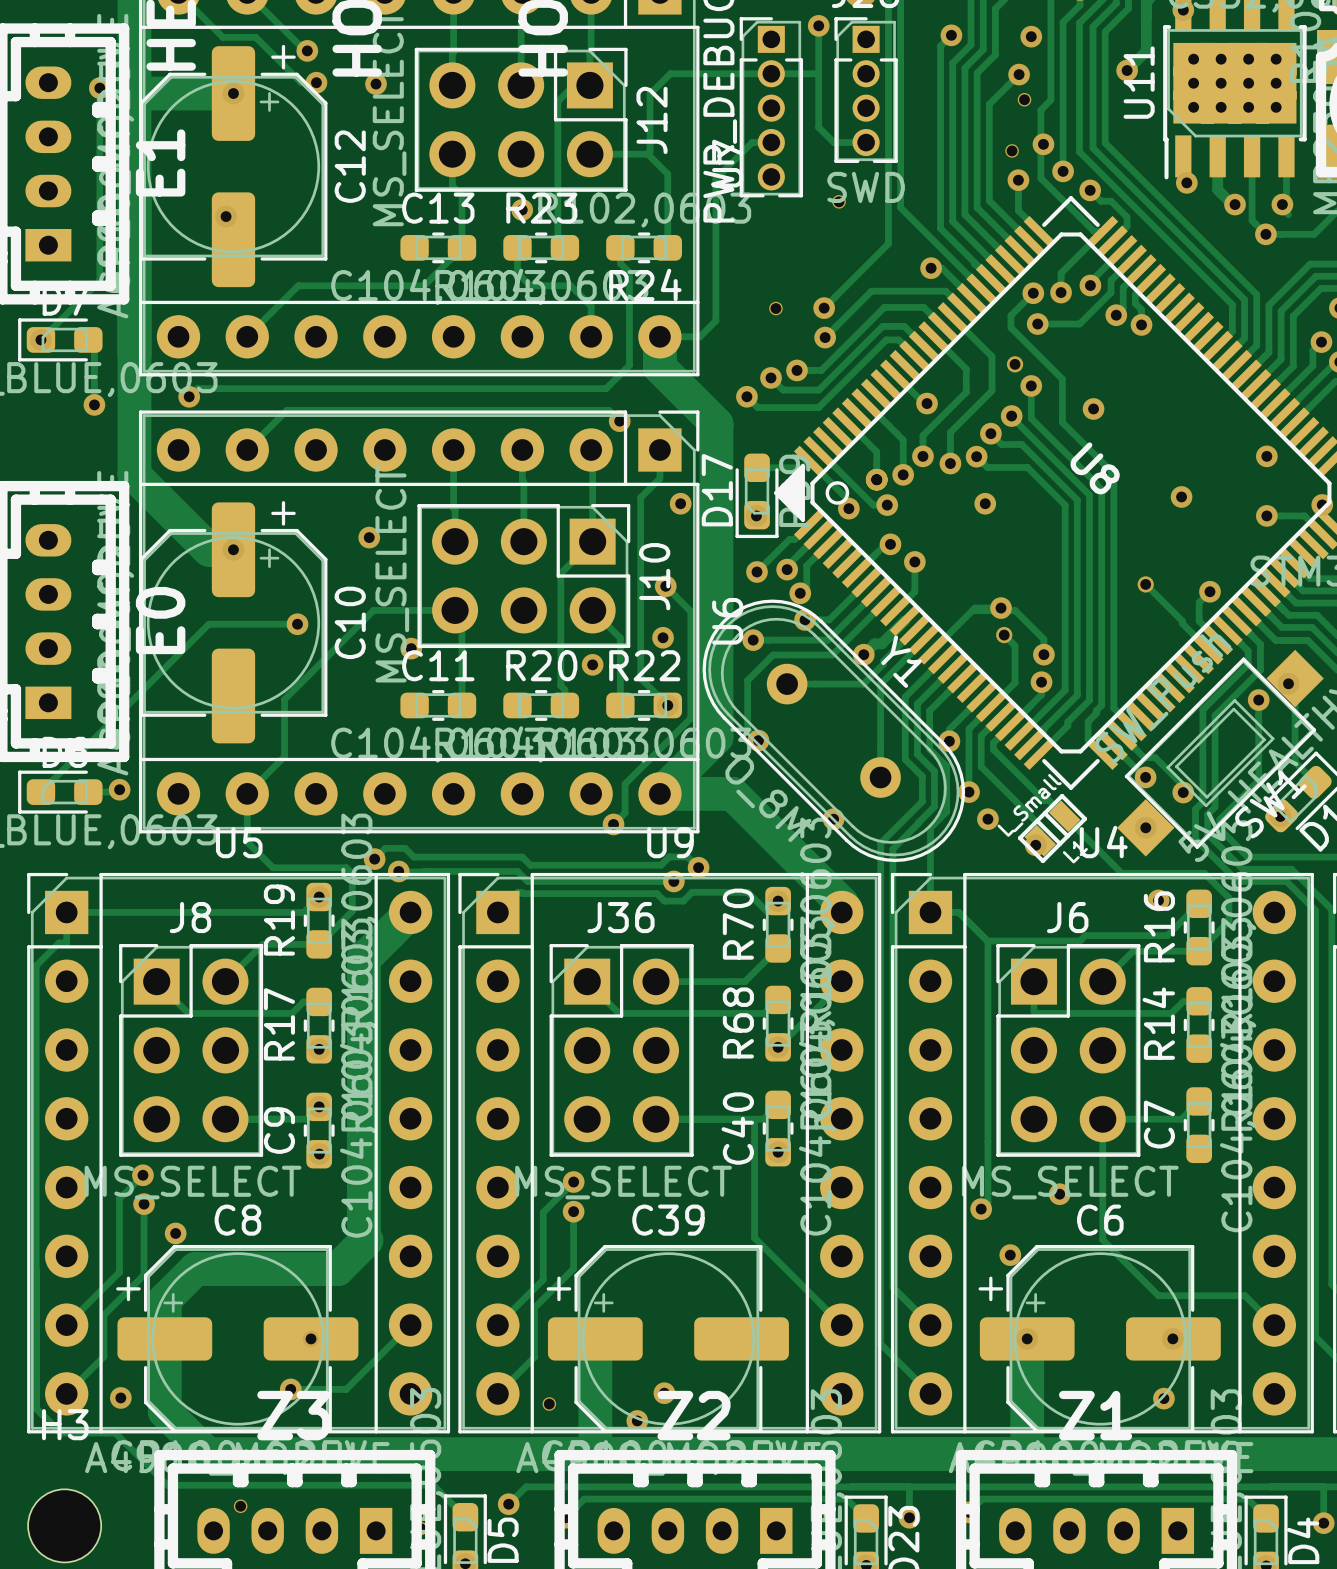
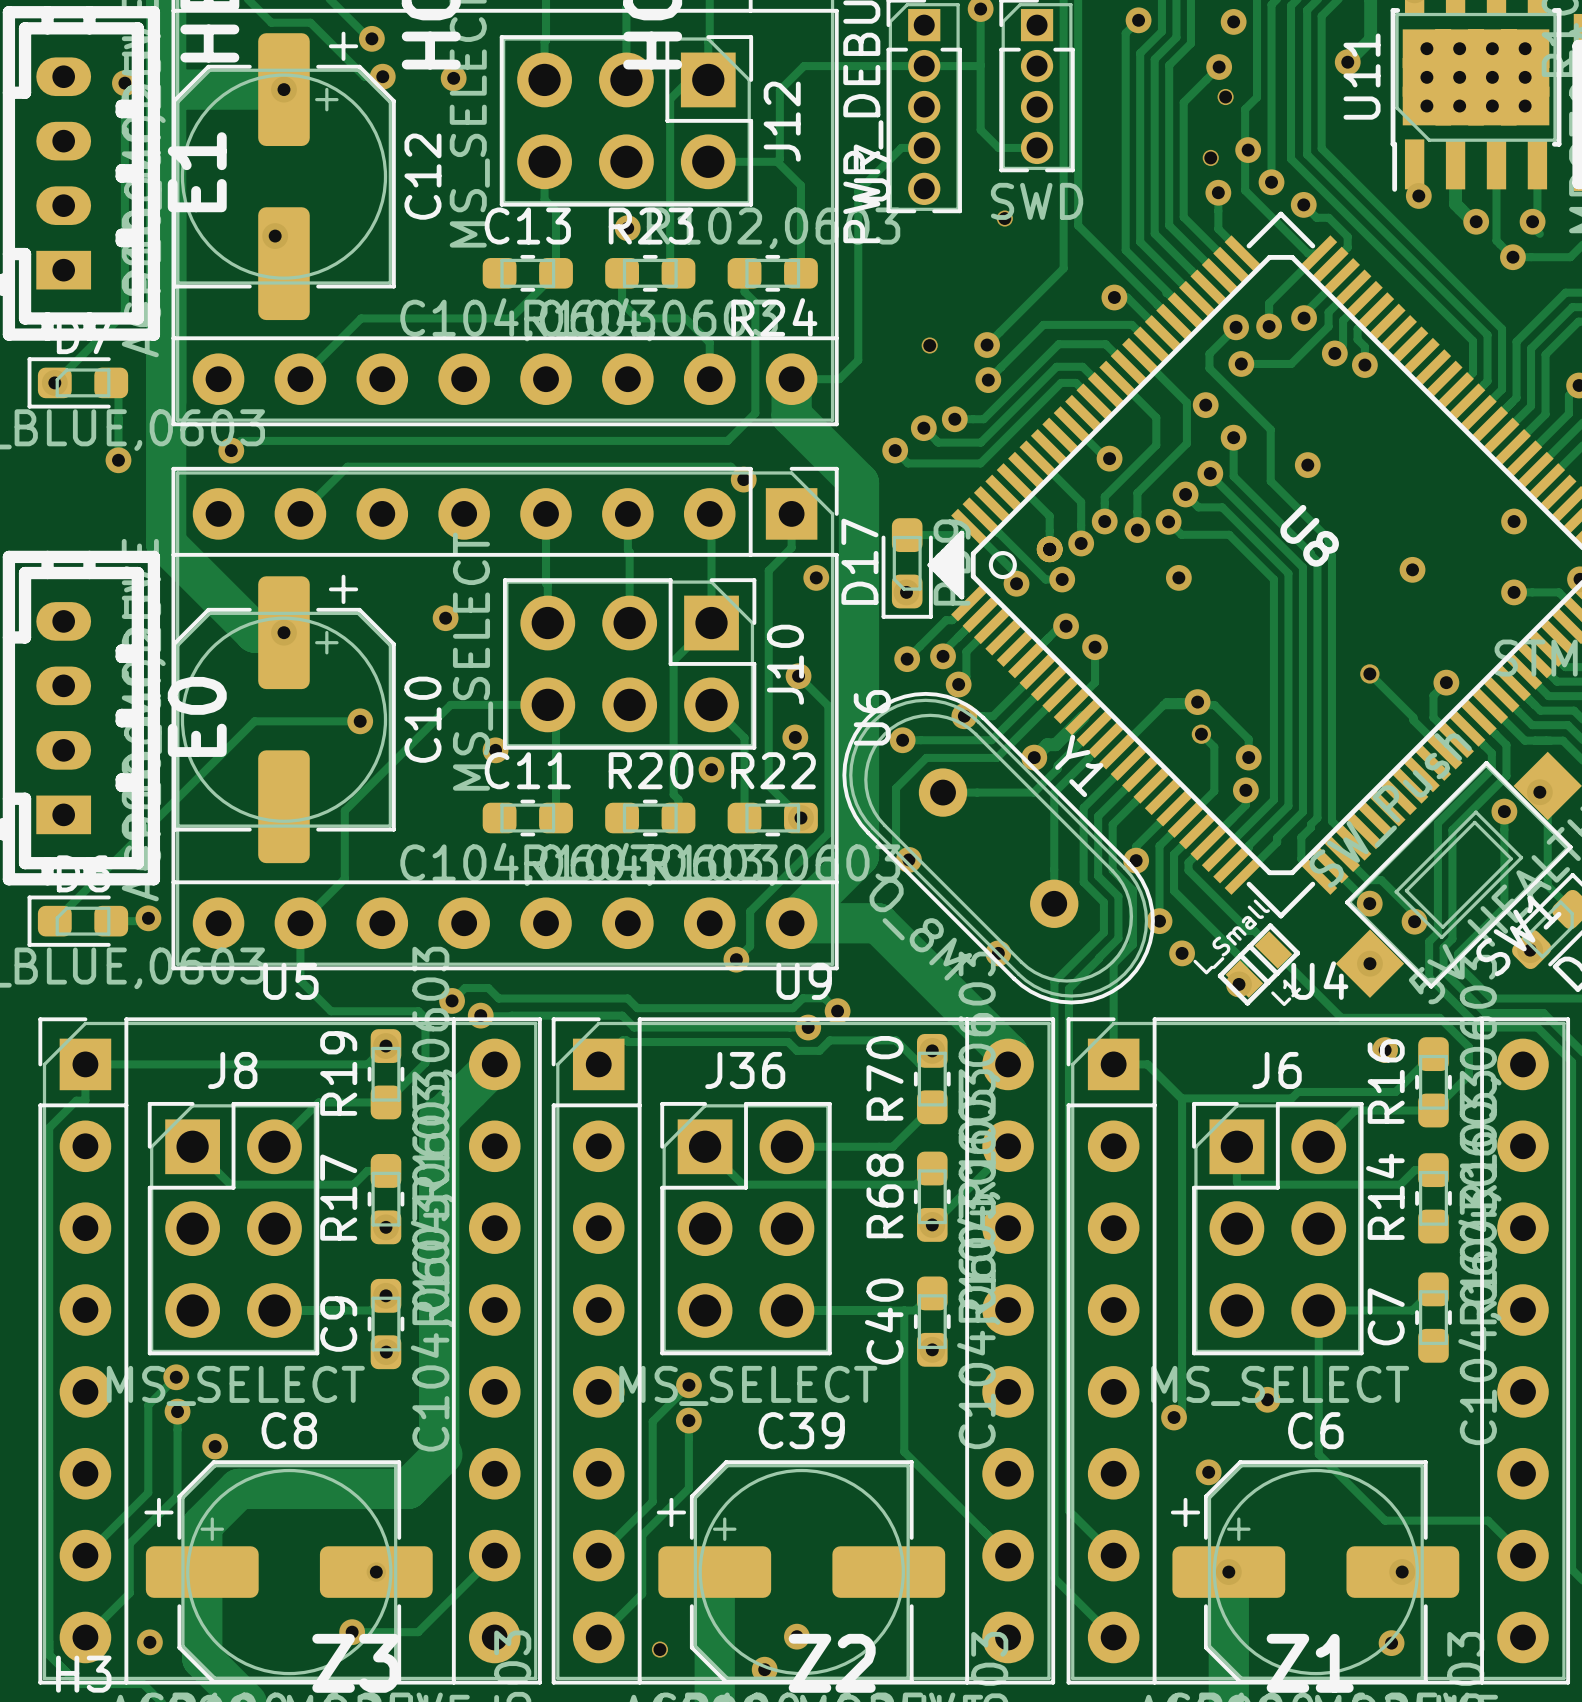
via size: [1006, 356, 1024, 373] -> [1192, 392, 1219, 419]

